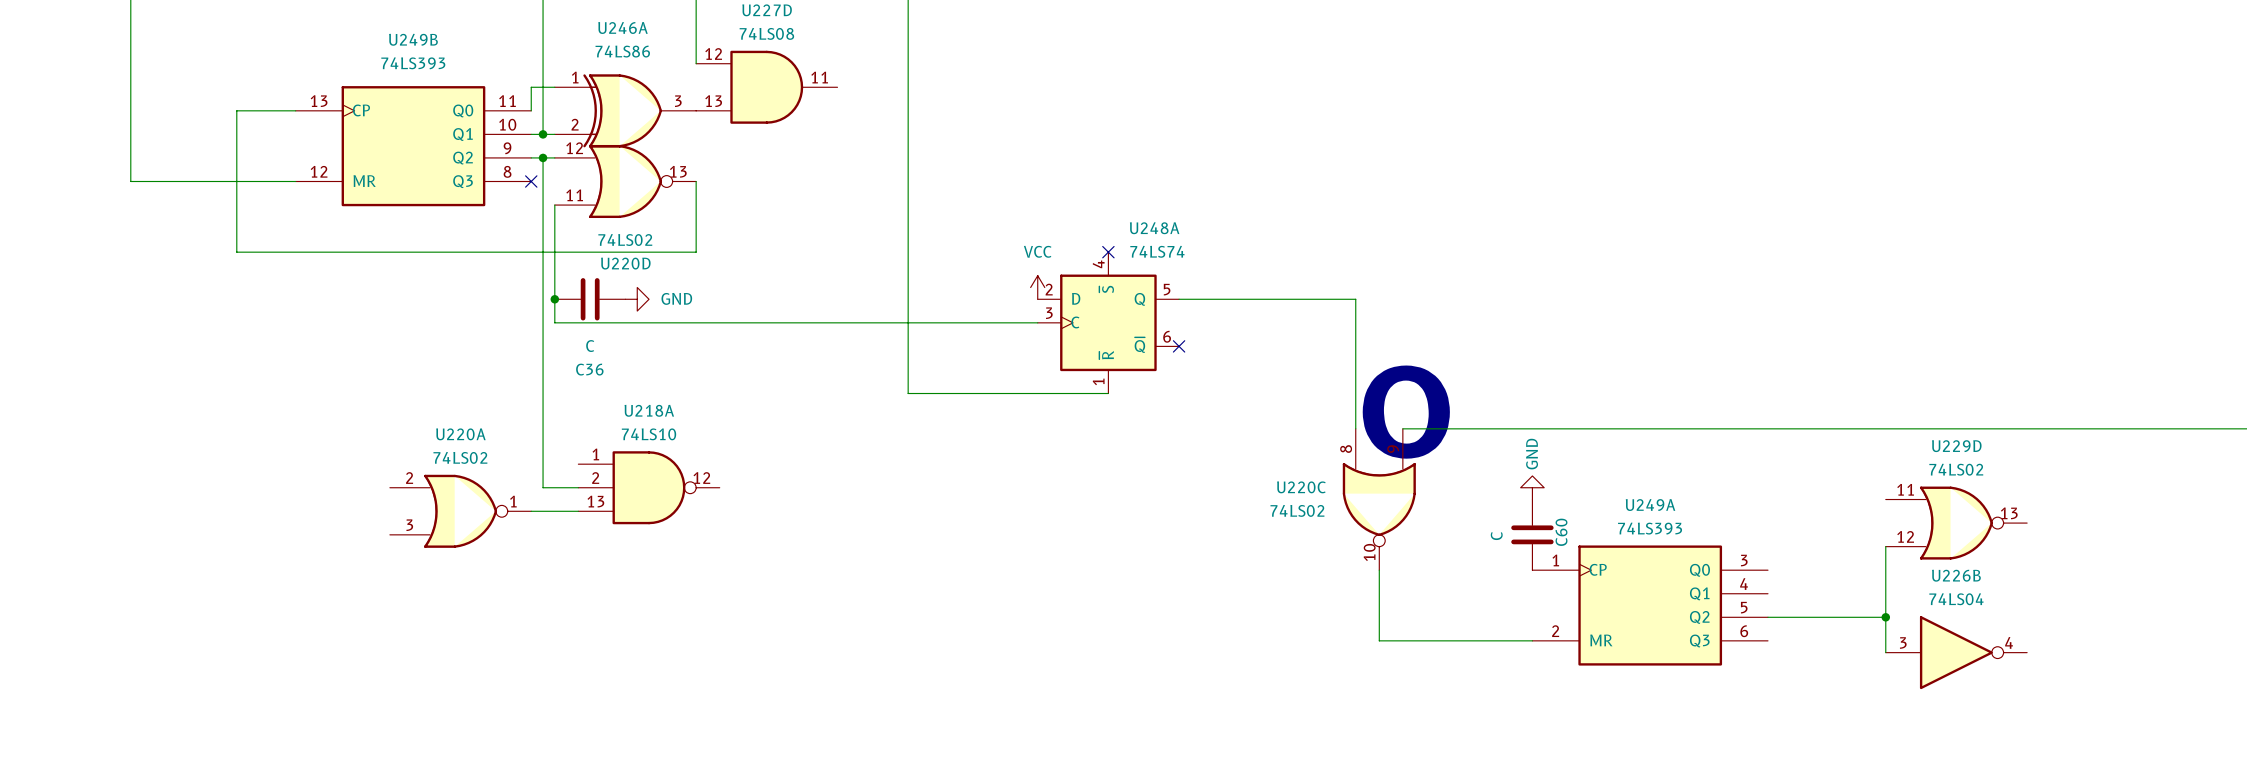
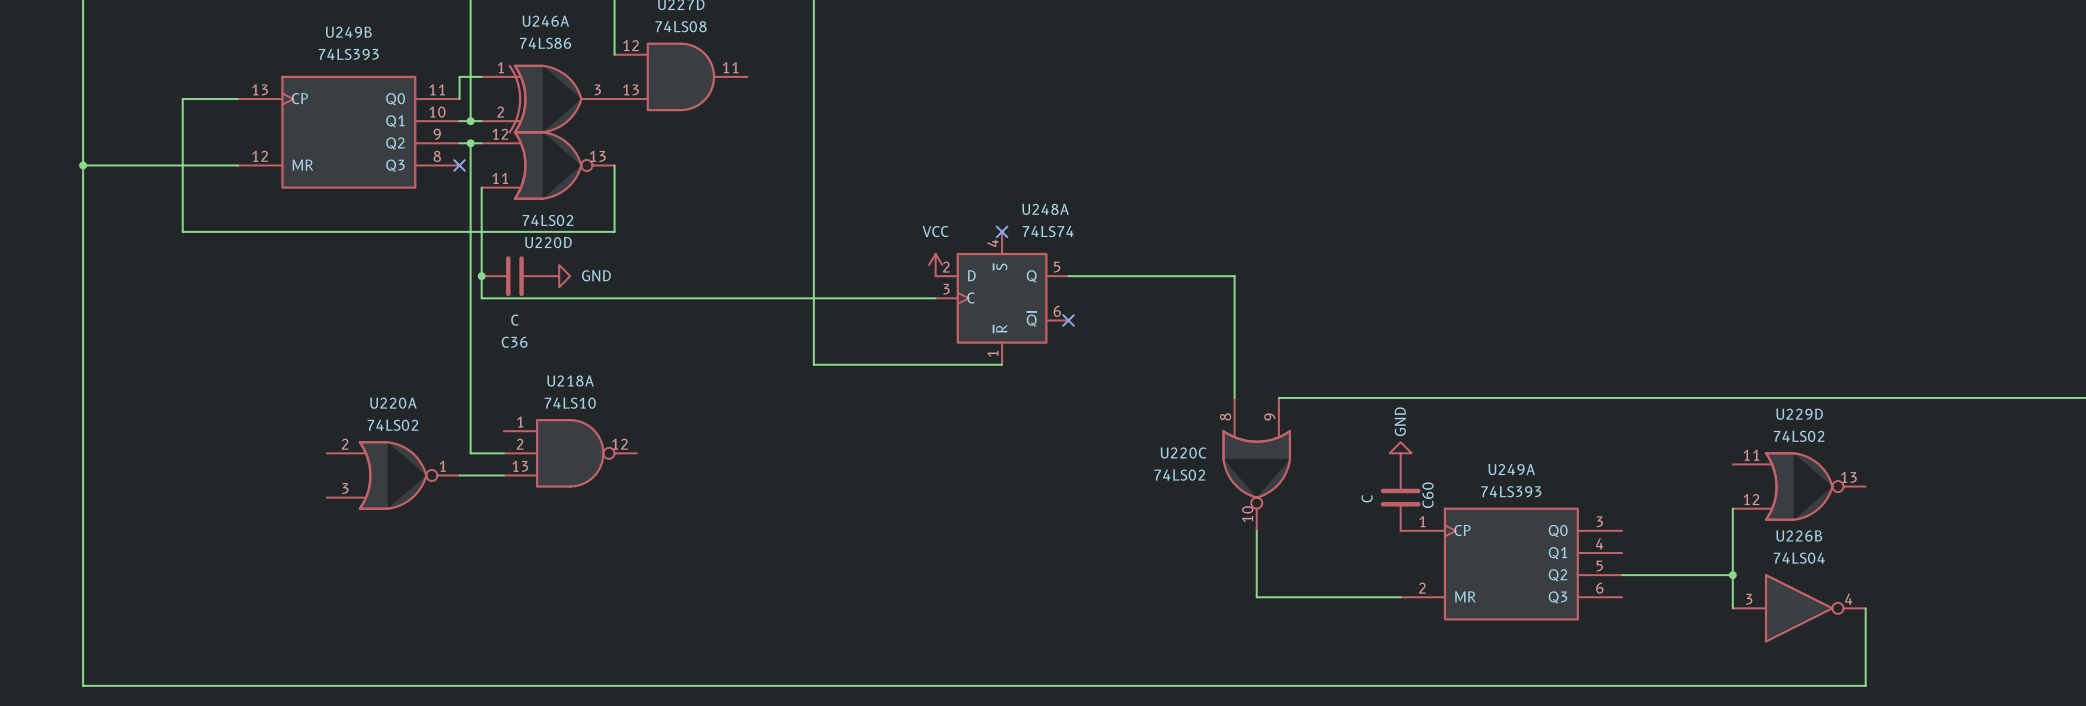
wire: none -> (83, 165) (83, 685) (1865, 685) (1865, 608)
junction: none -> (83, 165)
text: O (1406, 412) -> none

